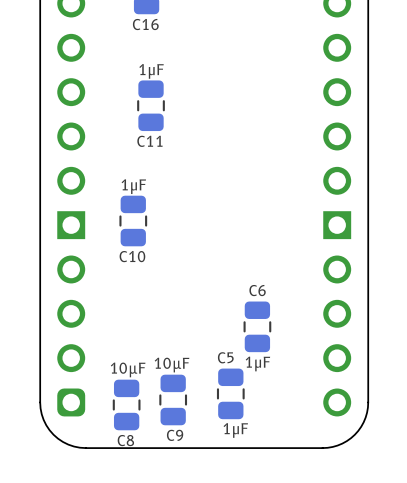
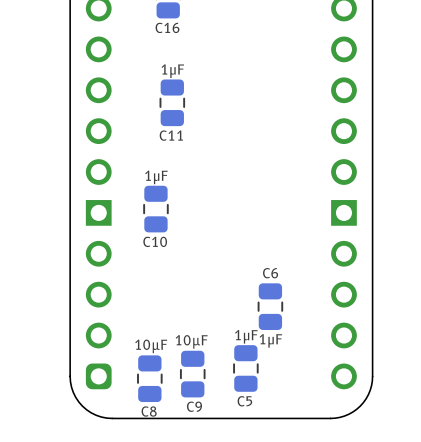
C5 name position: C5 (225, 357) -> C5 (244, 401)
C5 value position: 1μF (235, 430) -> 1μF (246, 336)

